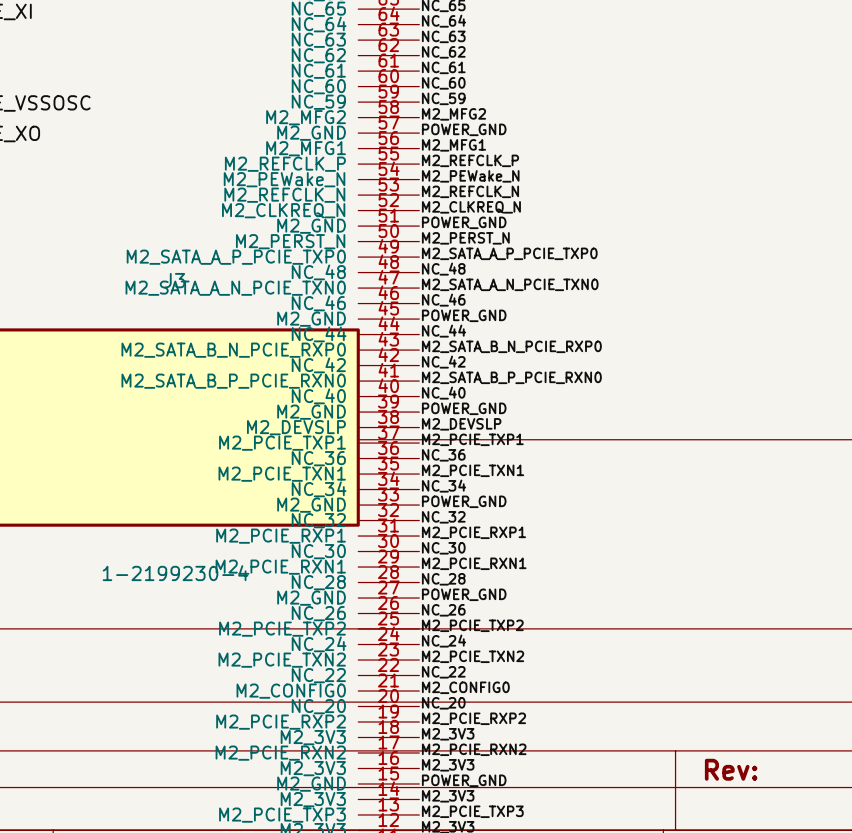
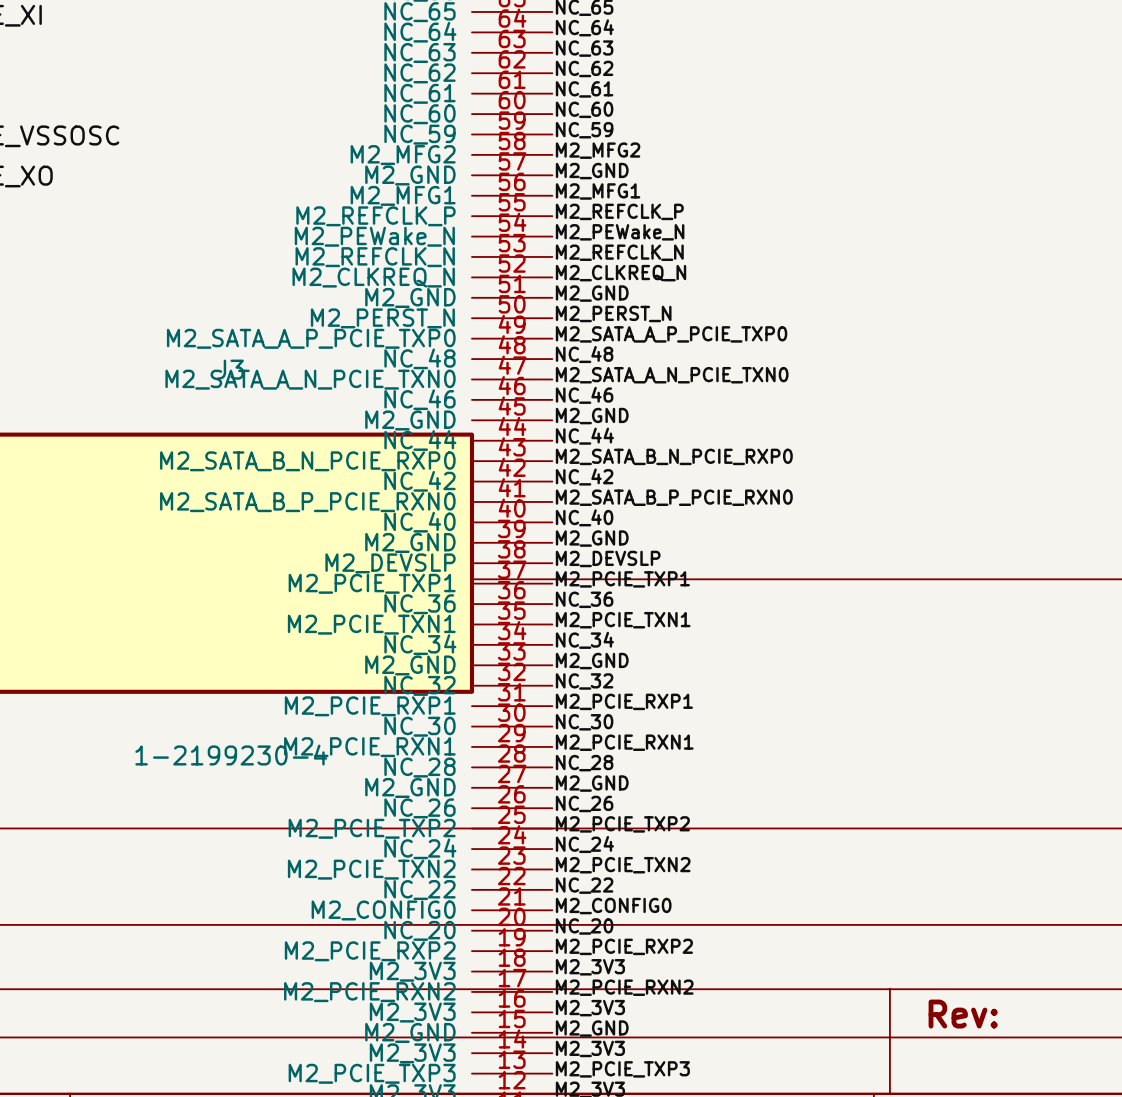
label: POWER_GND (464, 129) -> M2_GND (592, 171)
label: POWER_GND (464, 222) -> M2_GND (592, 293)
label: POWER_GND (464, 315) -> M2_GND (592, 416)
label: POWER_GND (464, 408) -> M2_GND (592, 538)
label: POWER_GND (464, 501) -> M2_GND (592, 661)
label: POWER_GND (464, 594) -> M2_GND (592, 783)
label: POWER_GND (464, 780) -> M2_GND (592, 1028)

